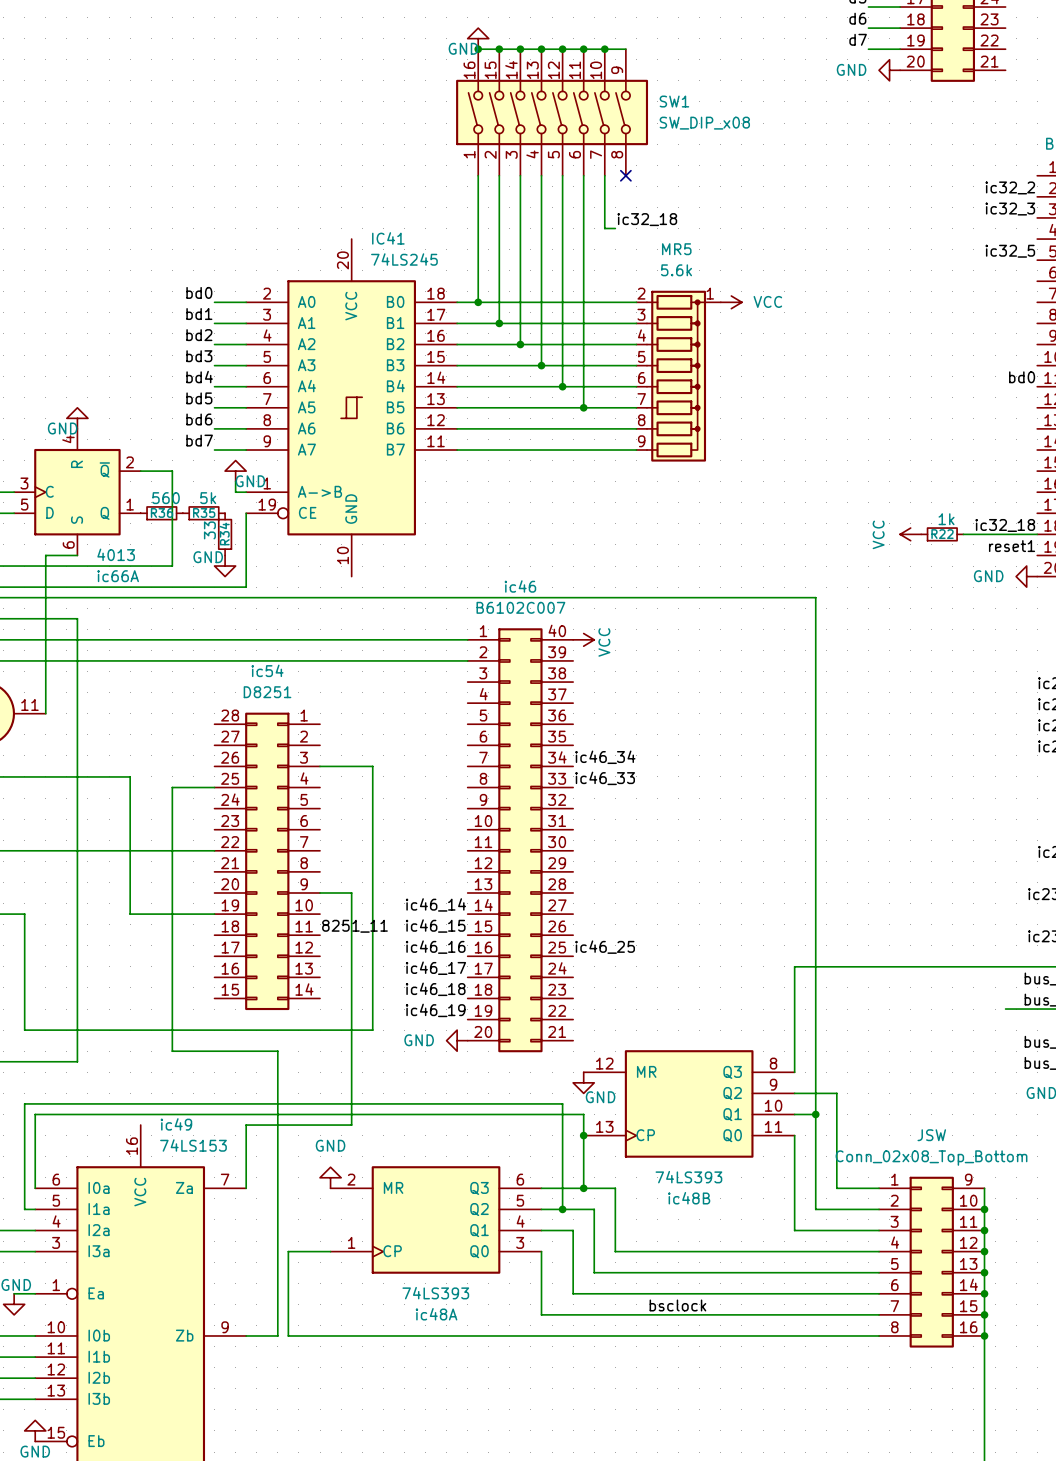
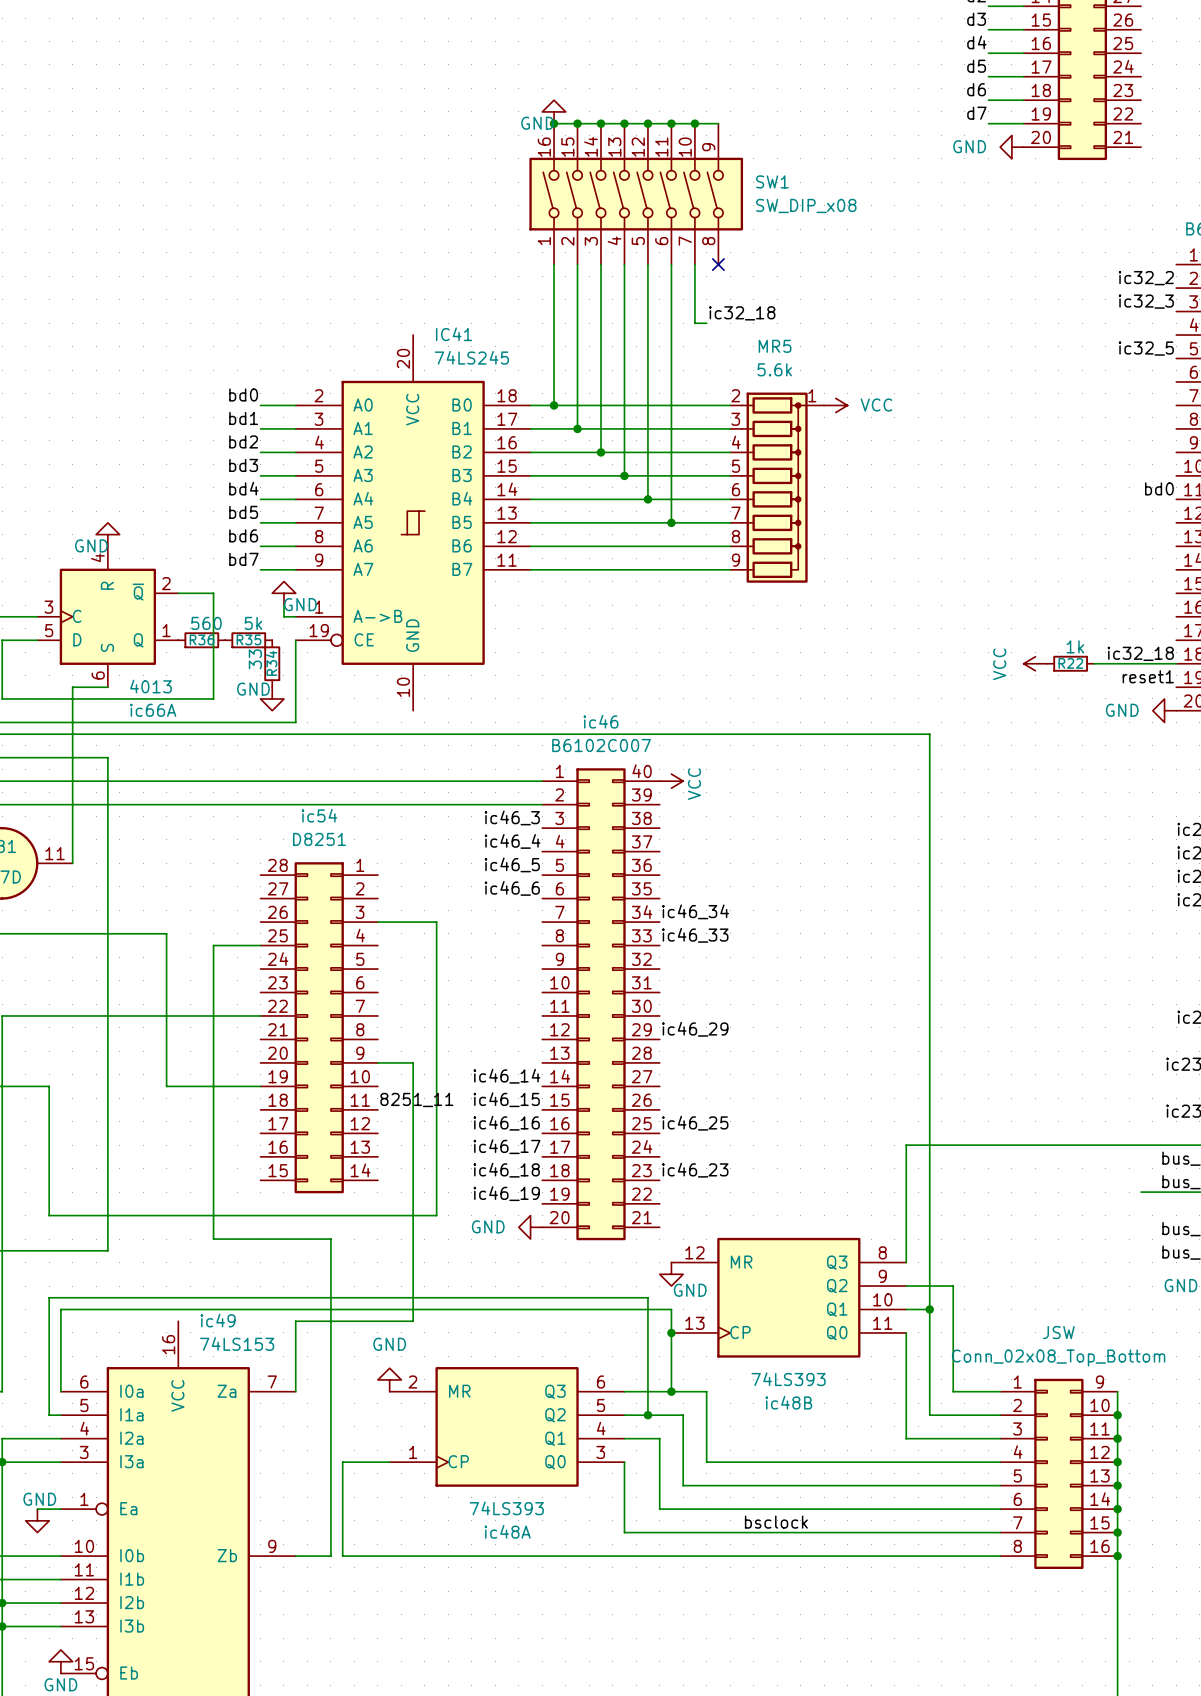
label: none -> ic46_3 (512, 817)
label: none -> ic46_4 (512, 841)
label: none -> ic46_5 (512, 864)
label: none -> ic46_6 (512, 888)
label: none -> ic46_29 (695, 1029)
label: none -> ic46_23 (695, 1170)

